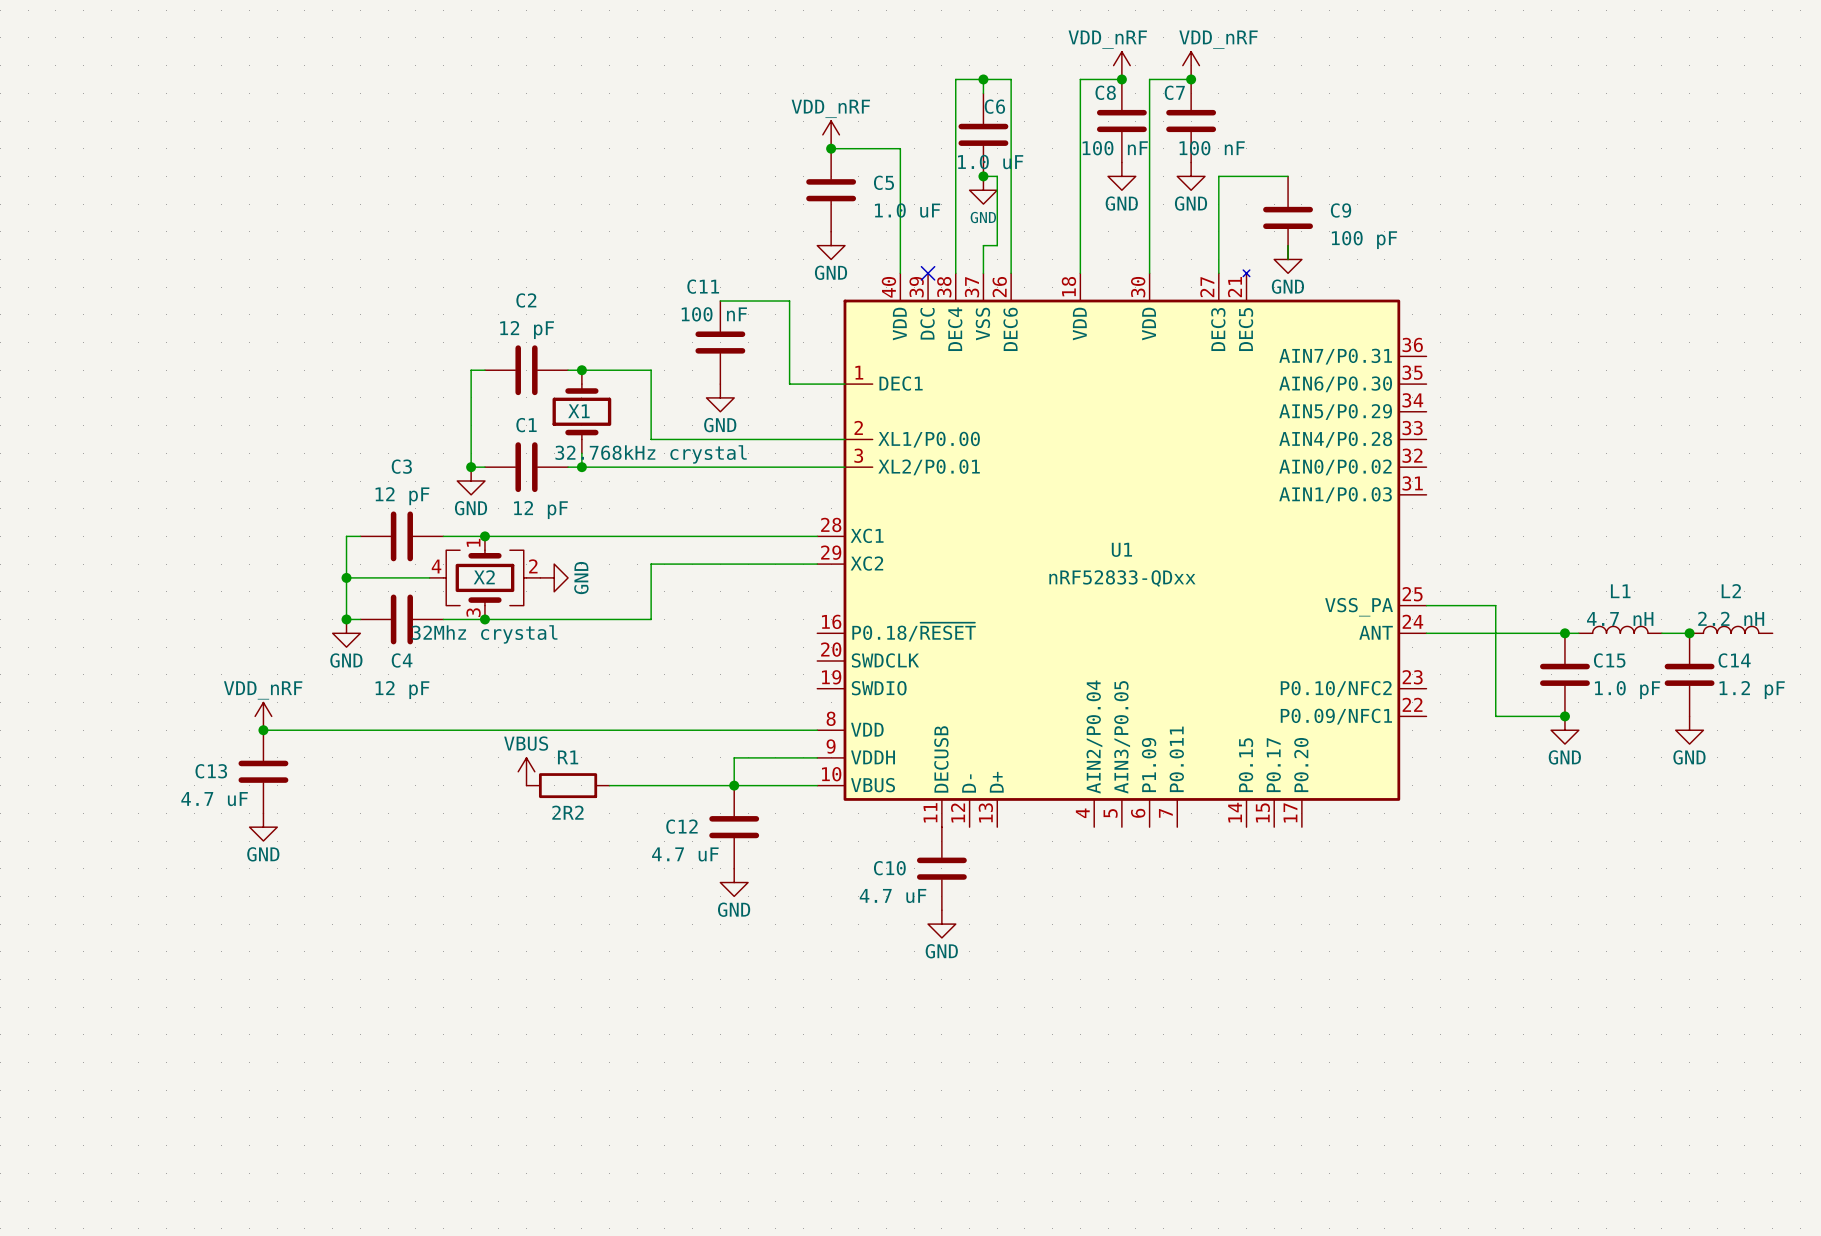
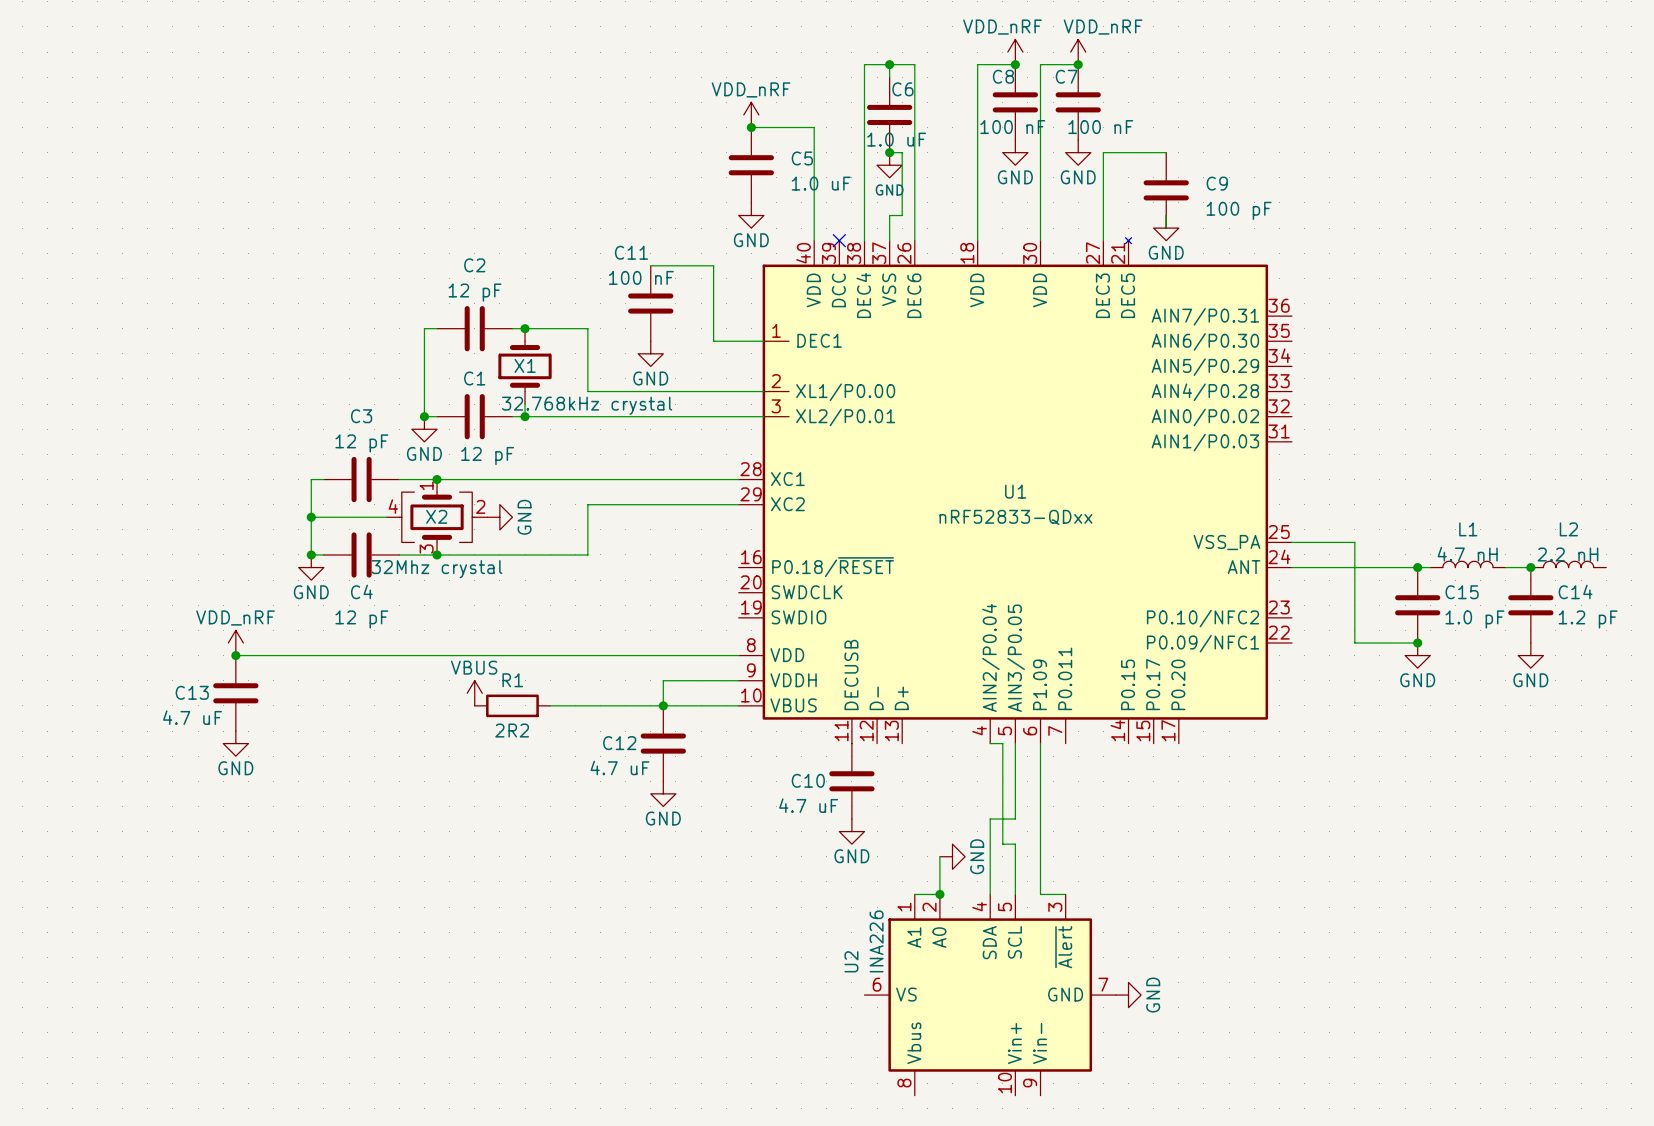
wire: none -> (990, 743) (1002, 743) (1002, 844) (1015, 844) (1015, 894)
wire: none -> (1015, 743) (1015, 819) (990, 819) (990, 894)
wire: none -> (1040, 743) (1040, 894) (1065, 894)
wire: none -> (939, 856) (939, 894) (914, 894)
power symbol: none -> GND (952, 856)
junction: none -> (939, 894)
U2: none -> INA226 (990, 995)
power symbol: none -> GND (1128, 995)

